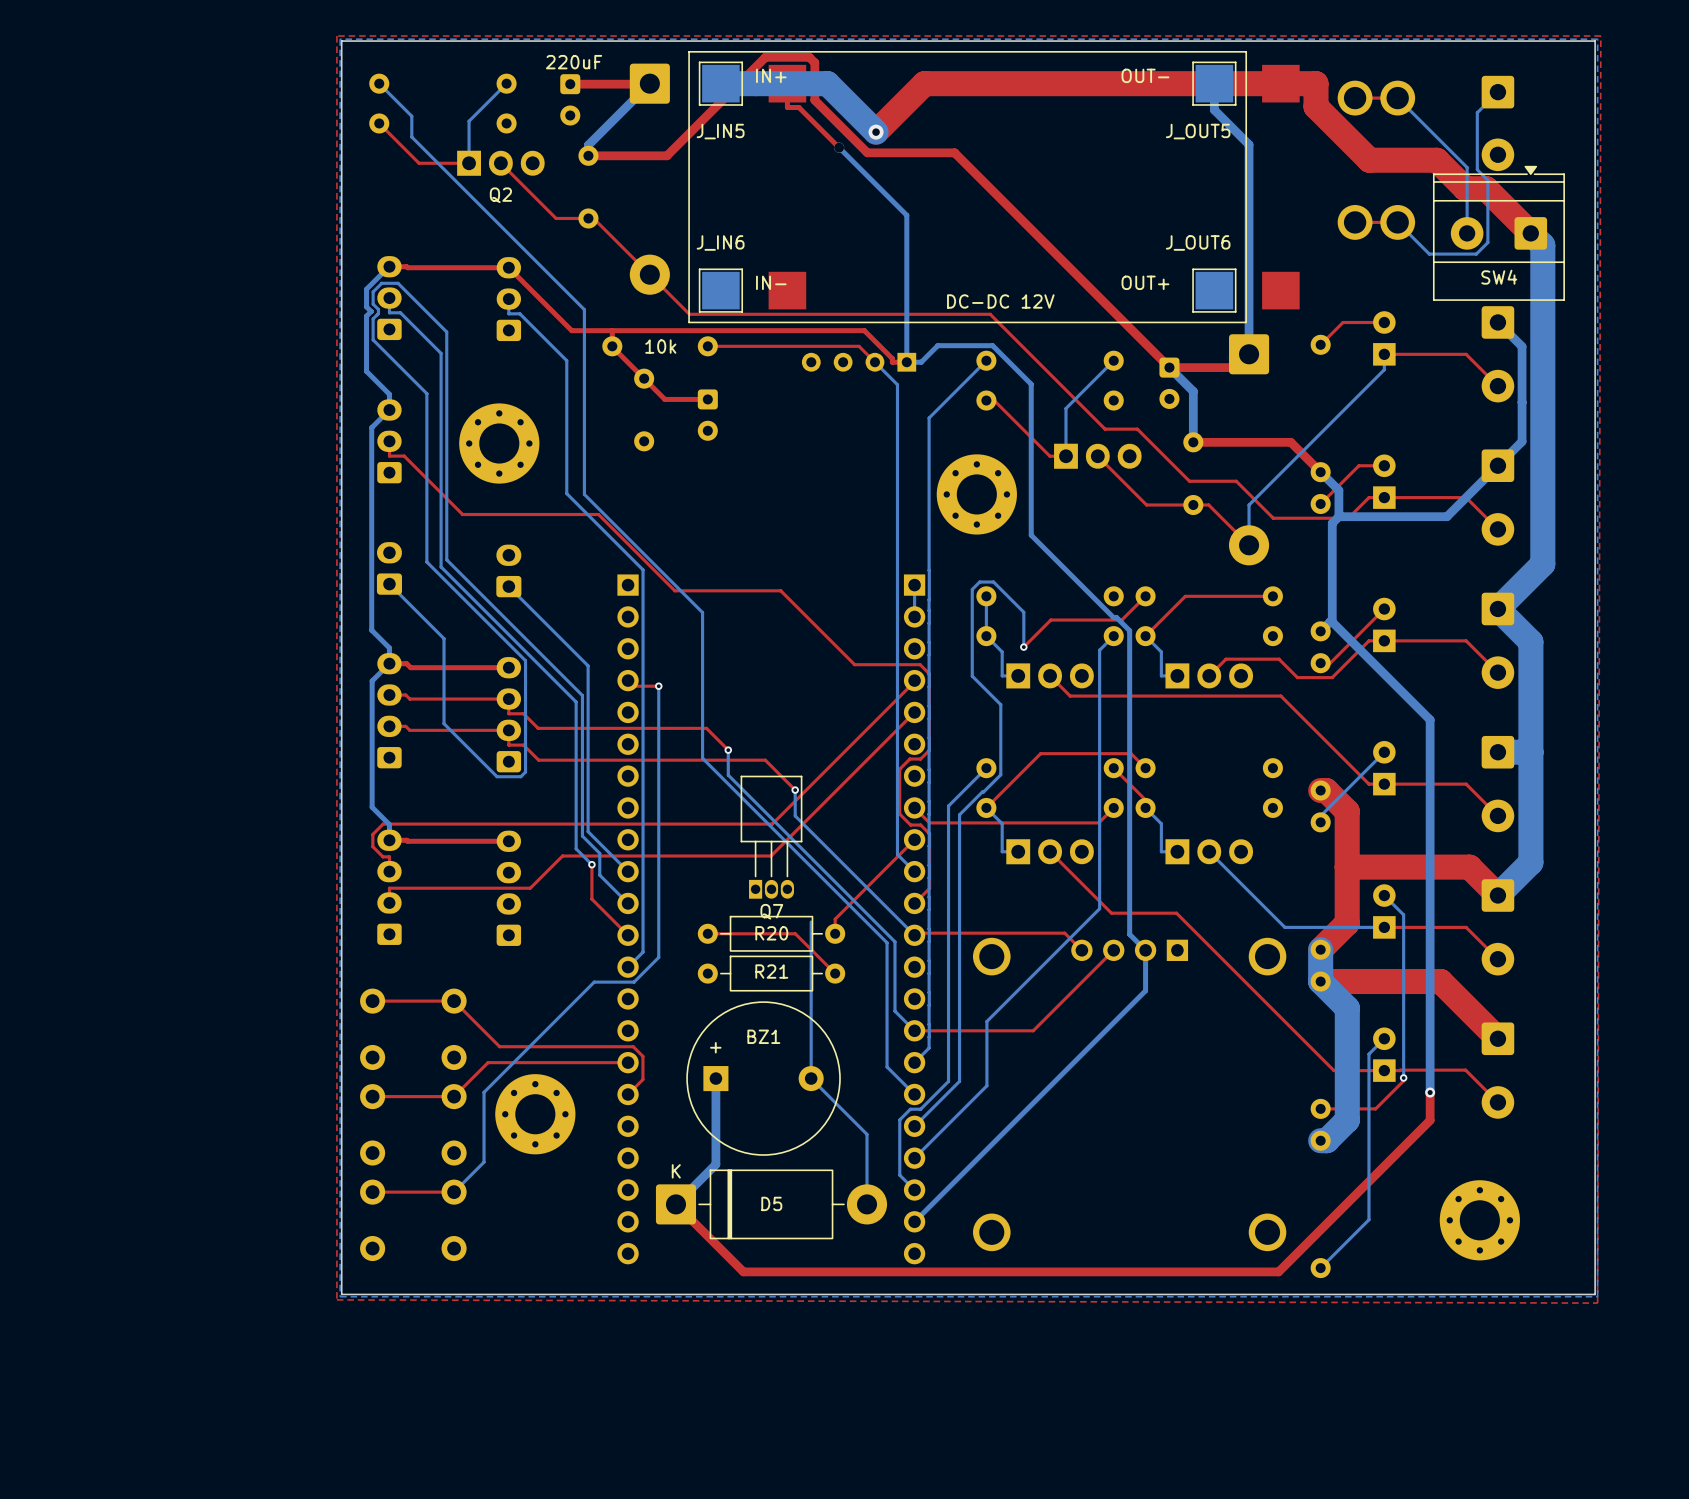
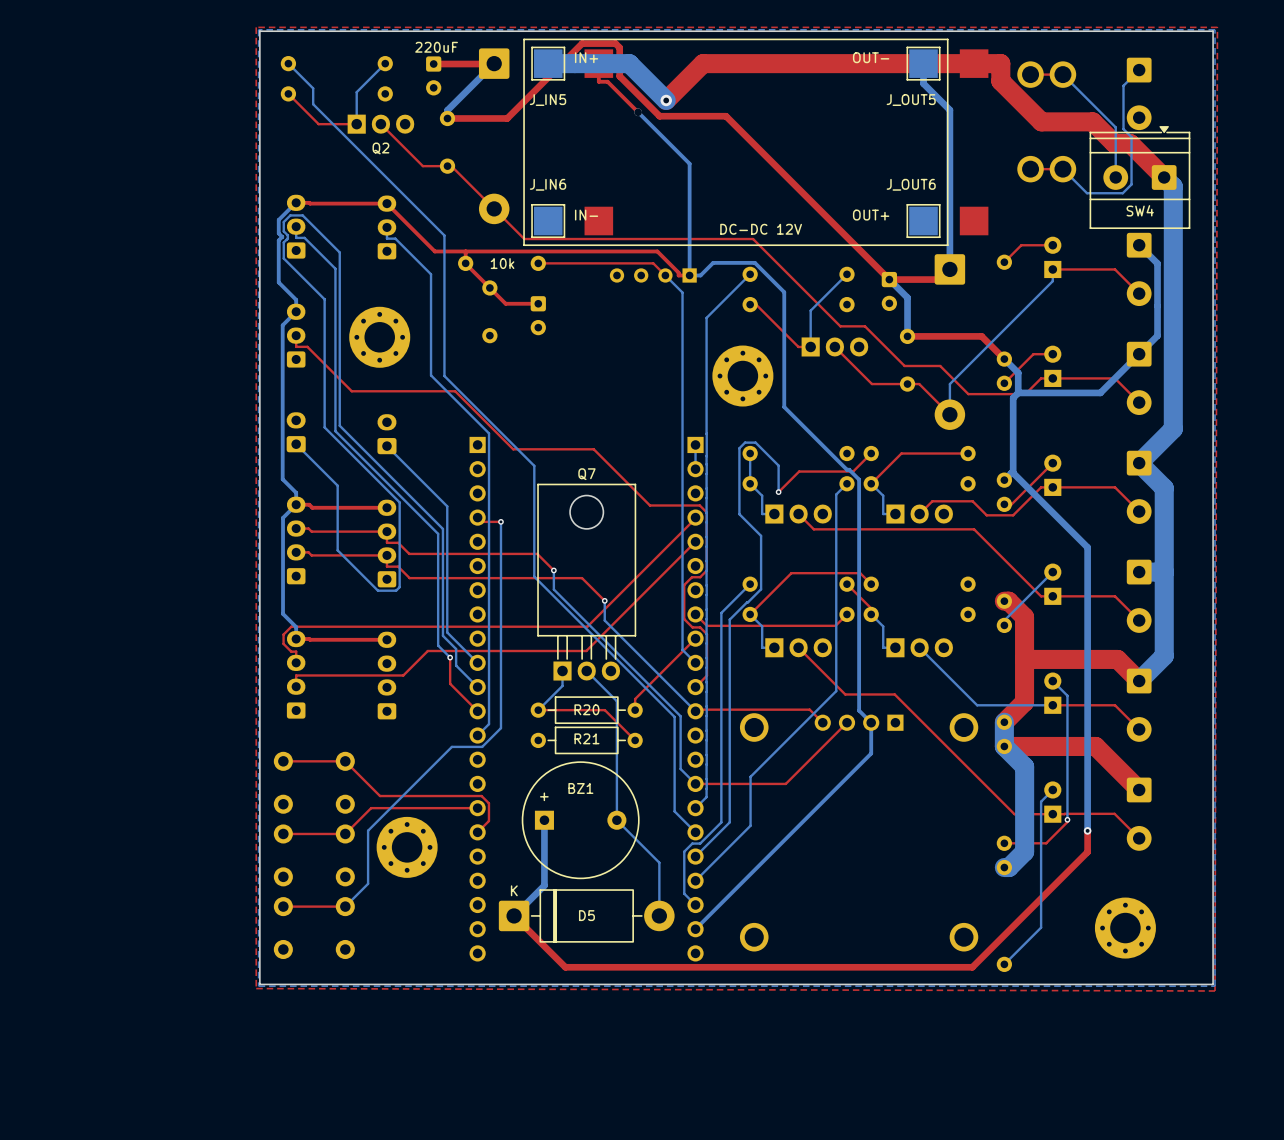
Q7 footprint: [740, 775, 803, 899] -> [537, 483, 637, 681]
bottom track: none -> (562, 671) (562, 685) (538, 710)
bottom track: none -> (586, 671) (616, 701)
Q7 name position: Q7 (771, 911) -> Q7 (586, 474)

